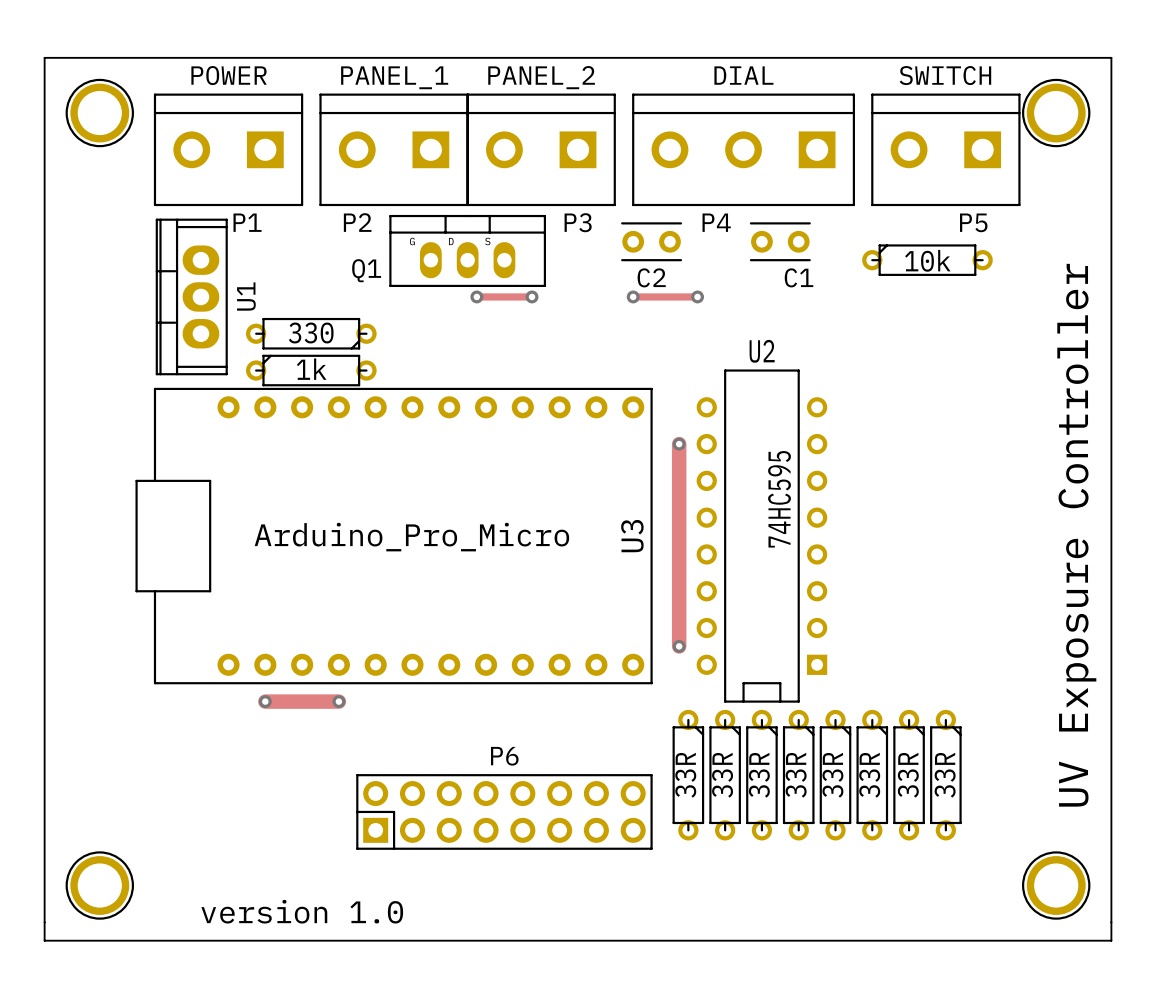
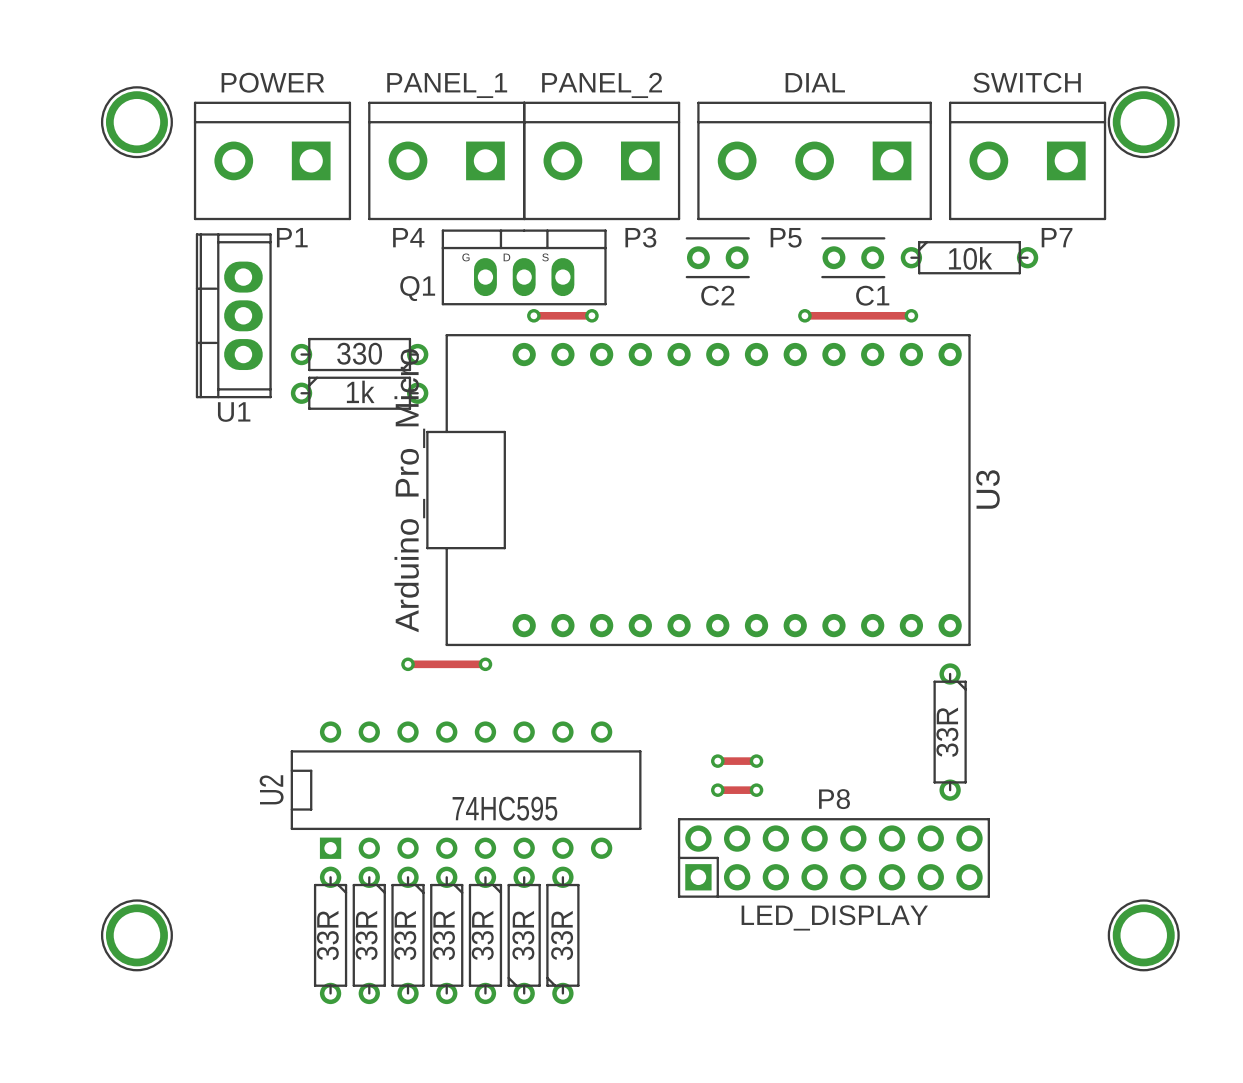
board edge: (44, 57) (44, 940) (1111, 940) (1111, 57) (44, 57) -> none
P2 name: P2 (357, 222) -> P4 (408, 237)
P4 name: P4 (716, 222) -> P5 (786, 237)
P5 name: P5 (973, 222) -> P7 (1057, 237)
part position: (927, 260) -> (969, 257)
U1 name rotation: 0° (246, 296) -> 90° clockwise (234, 412)
U1 name position: U1 (246, 296) -> U1 (234, 412)
track: (633, 296) (697, 296) -> none
via: (633, 296) -> none
via position: (697, 296) -> (804, 315)
track: none -> (804, 315) (911, 315)
via: none -> (911, 315)
U2 name position: U2 (762, 351) -> U2 (271, 789)
track: (679, 444) (679, 646) -> none
via: (679, 444) -> none
text: UV Exposure Controller (1076, 535) -> none
U3 position: (394, 536) -> (698, 490)
U3 name position: U3 (632, 536) -> U3 (987, 489)
U2 rotation: 0° (761, 536) -> 90° clockwise (466, 790)
U2 position: (761, 536) -> (466, 790)
U3 value rotation: 0° (411, 537) -> 90° counterclockwise (409, 490)
via: none -> (408, 664)
via: none -> (485, 664)
via: (679, 646) -> none
part: none -> 33R (950, 732)
track: (265, 701) (338, 701) -> (408, 664) (485, 664)
via: (265, 701) -> none
via: (338, 701) -> none
track: none -> (717, 761) (756, 761)
via: none -> (717, 761)
via: none -> (756, 761)
track: none -> (717, 790) (756, 790)
via: none -> (717, 790)
via: none -> (756, 790)
part: 33R (688, 775) -> none
part: 33R (725, 775) -> none
part: 33R (761, 775) -> none
part: 33R (798, 775) -> none
part: 33R (835, 775) -> none
part: 33R (872, 775) -> none
part: 33R (909, 775) -> none
part: 33R (945, 775) -> none
P6: (504, 811) -> none
P8: none -> LED_DISPLAY (833, 857)
part: none -> 33R (330, 935)
part: none -> 33R (369, 935)
part: none -> 33R (408, 935)
part: none -> 33R (446, 935)
part: none -> 33R (485, 935)
part: none -> 33R (524, 935)
part: none -> 33R (562, 935)
text: version 1.0 (302, 911) -> none

